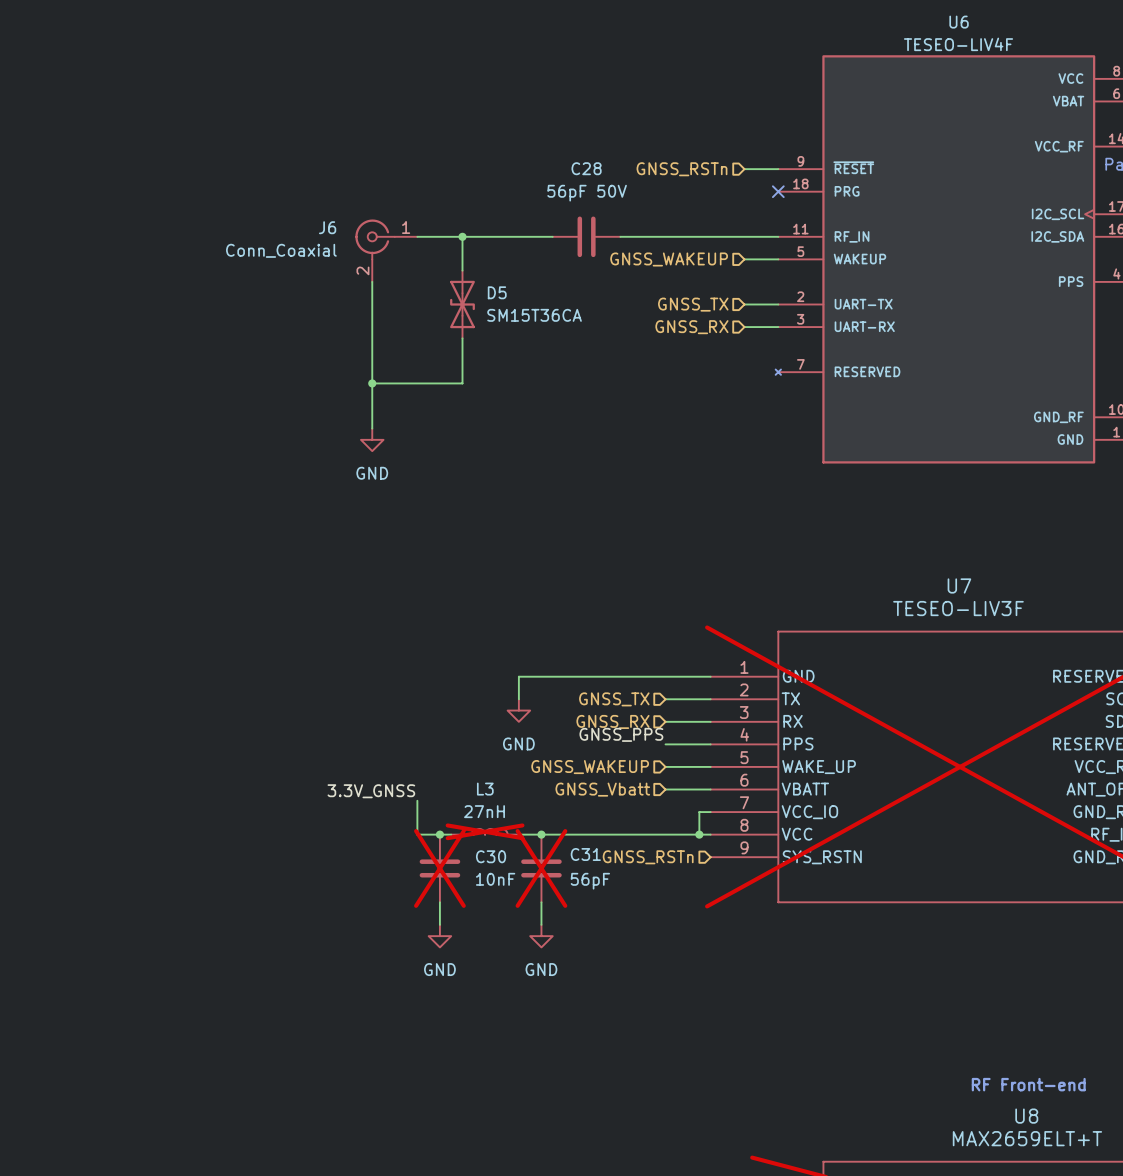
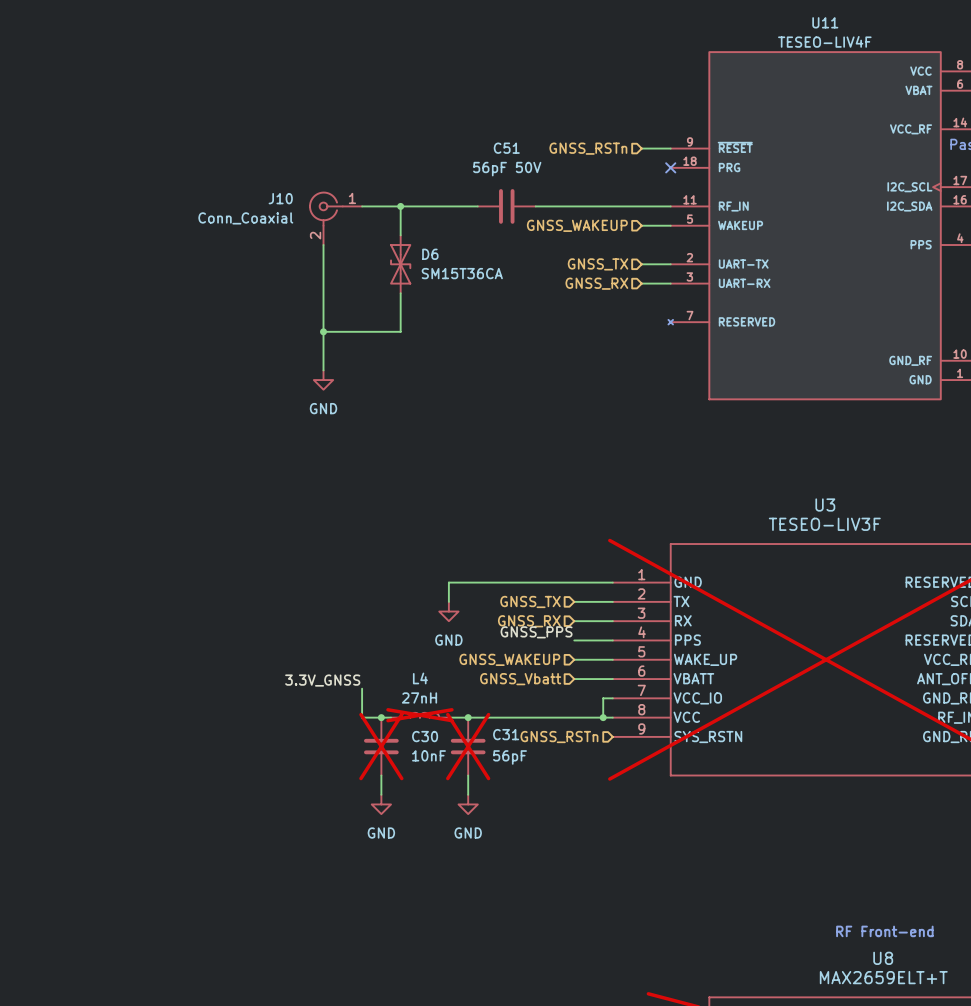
U6 name: U6 (959, 22) -> U11 (825, 22)
C28 name: C28 (586, 168) -> C51 (506, 148)
J6 name: J6 (327, 227) -> J10 (280, 198)
D5 name: D5 (497, 292) -> D6 (430, 254)
U7 name: U7 (959, 585) -> U3 (825, 505)
L3 name: L3 (485, 789) -> L4 (420, 678)

